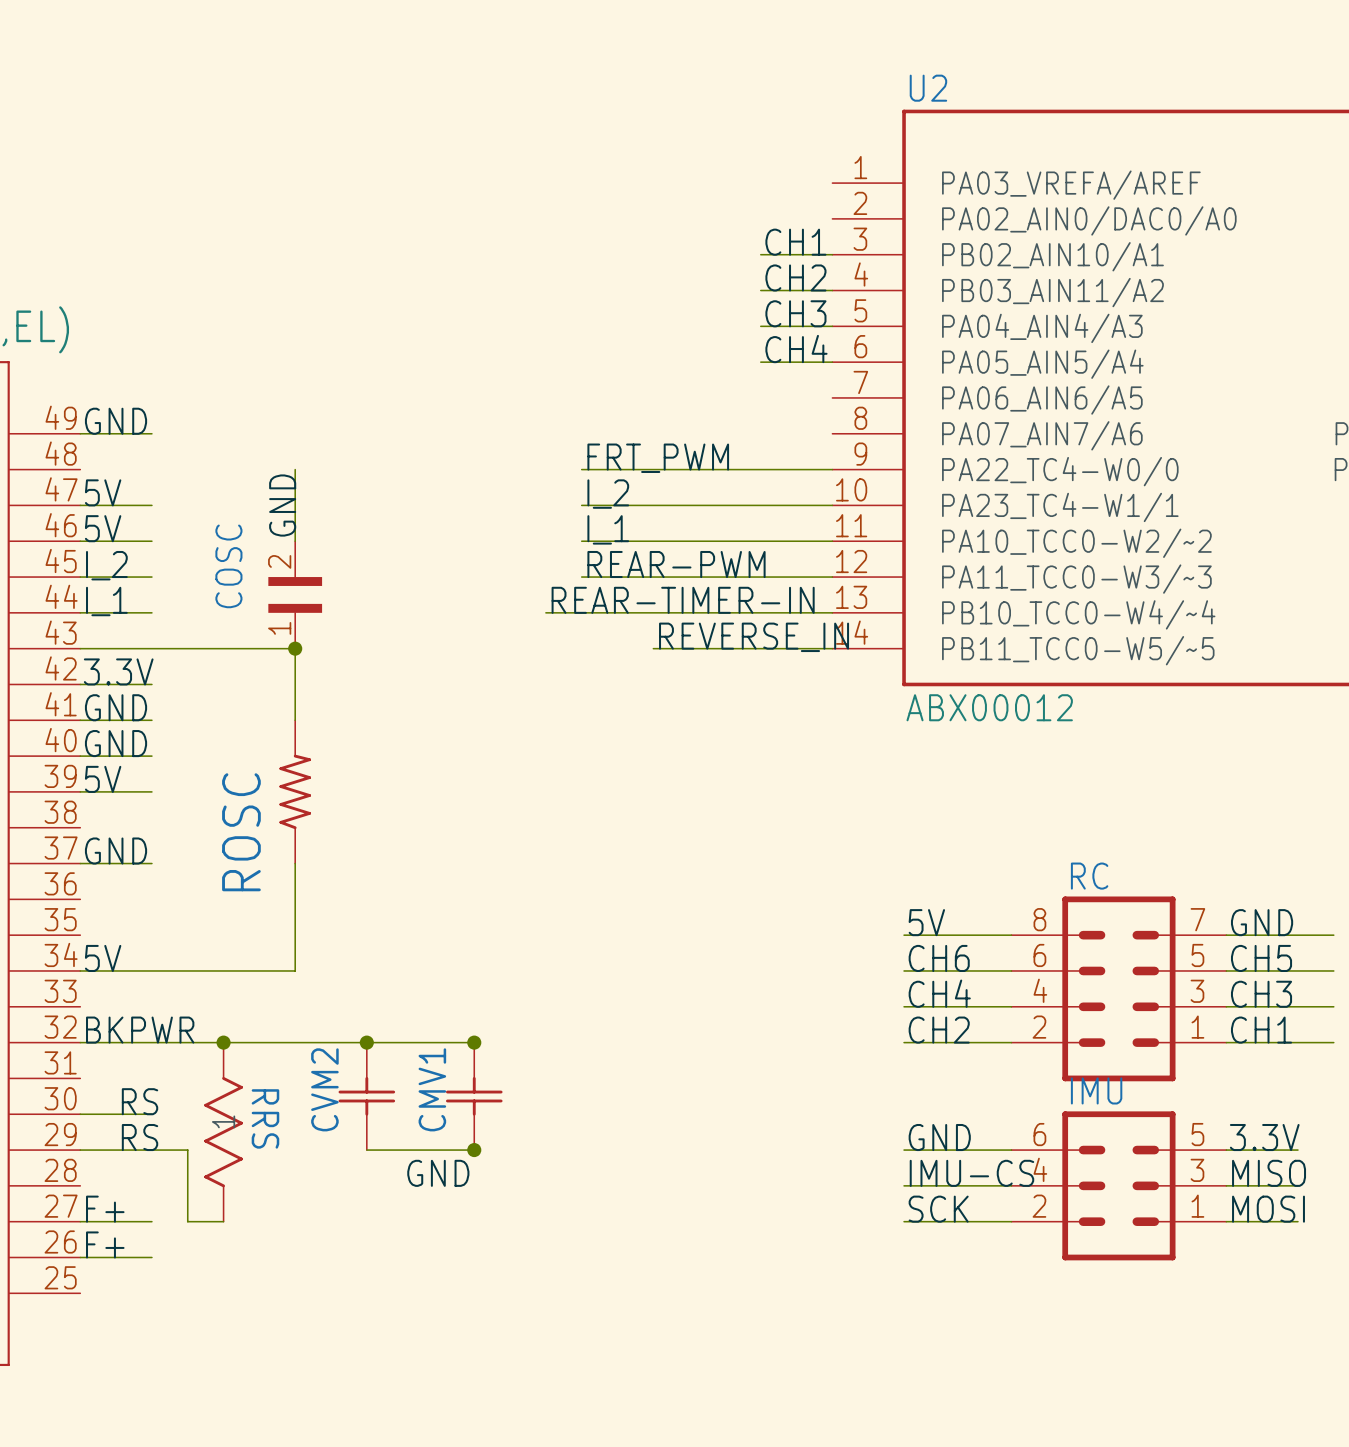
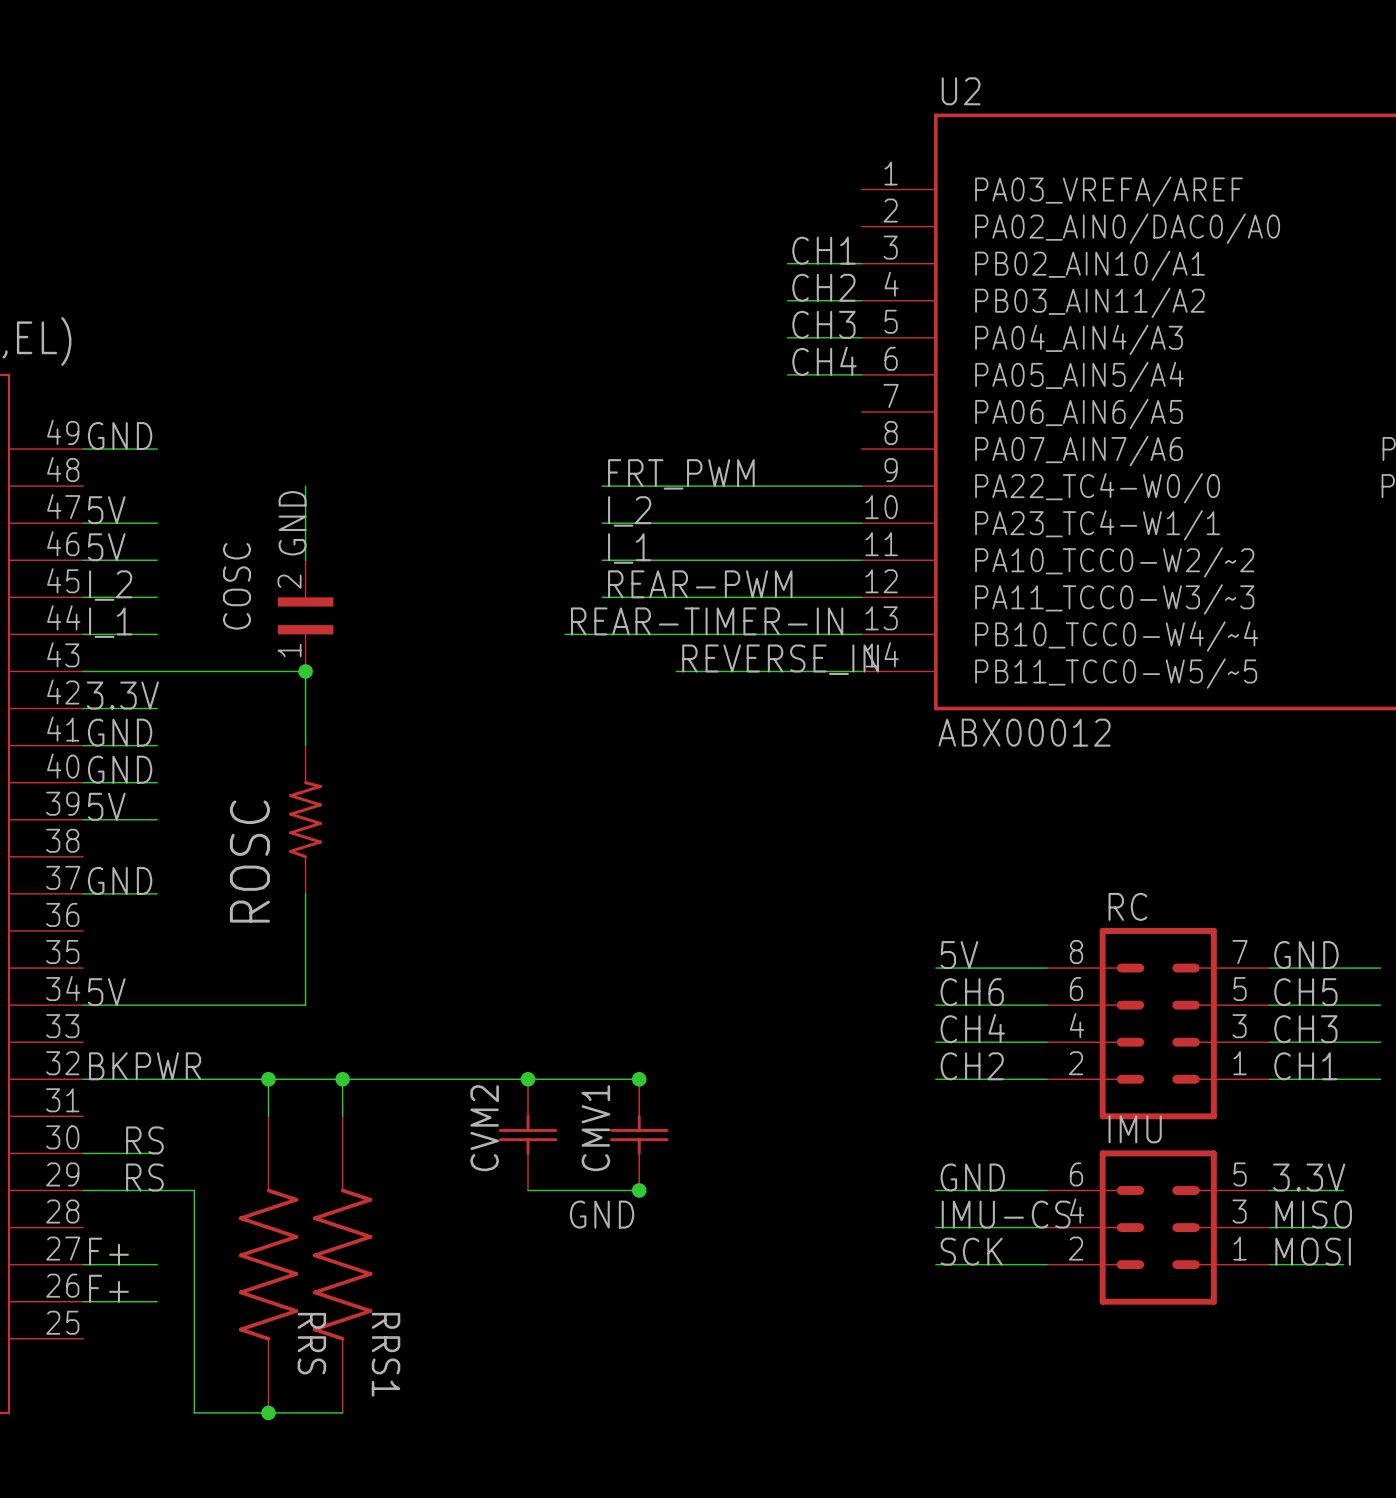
junction position: (223, 1042) -> (268, 1079)
wire: none -> (268, 1079) (268, 1116)
wire: none -> (342, 1079) (342, 1116)
junction position: (366, 1042) -> (342, 1079)
wire: none -> (490, 1079) (639, 1079)
junction position: (474, 1042) -> (528, 1079)
junction: none -> (639, 1079)
CVM2 position: (366, 1096) -> (528, 1134)
CMV1 position: (474, 1096) -> (639, 1134)
RRS: (223, 1132) -> none
wire: (366, 1150) (474, 1150) -> (528, 1190) (639, 1190)
junction: (474, 1150) -> none
junction: none -> (639, 1190)
label position: GND (438, 1173) -> GND (602, 1214)
wire: (187, 1221) (223, 1221) -> (194, 1264) (194, 1412) (342, 1412)
RRS: none -> (268, 1264)
RRS1: none -> (342, 1264)
junction: none -> (268, 1412)

